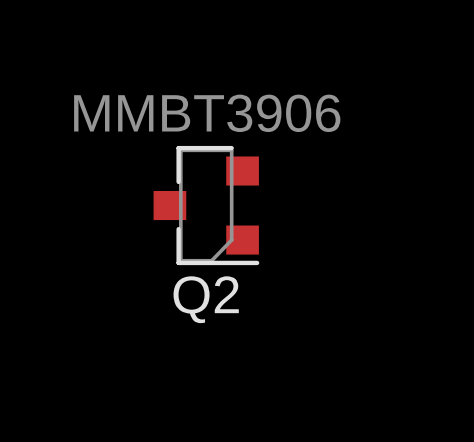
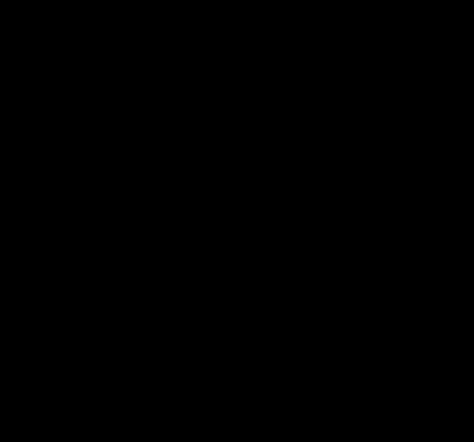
Q2: MMBT3906 (206, 205) -> none

